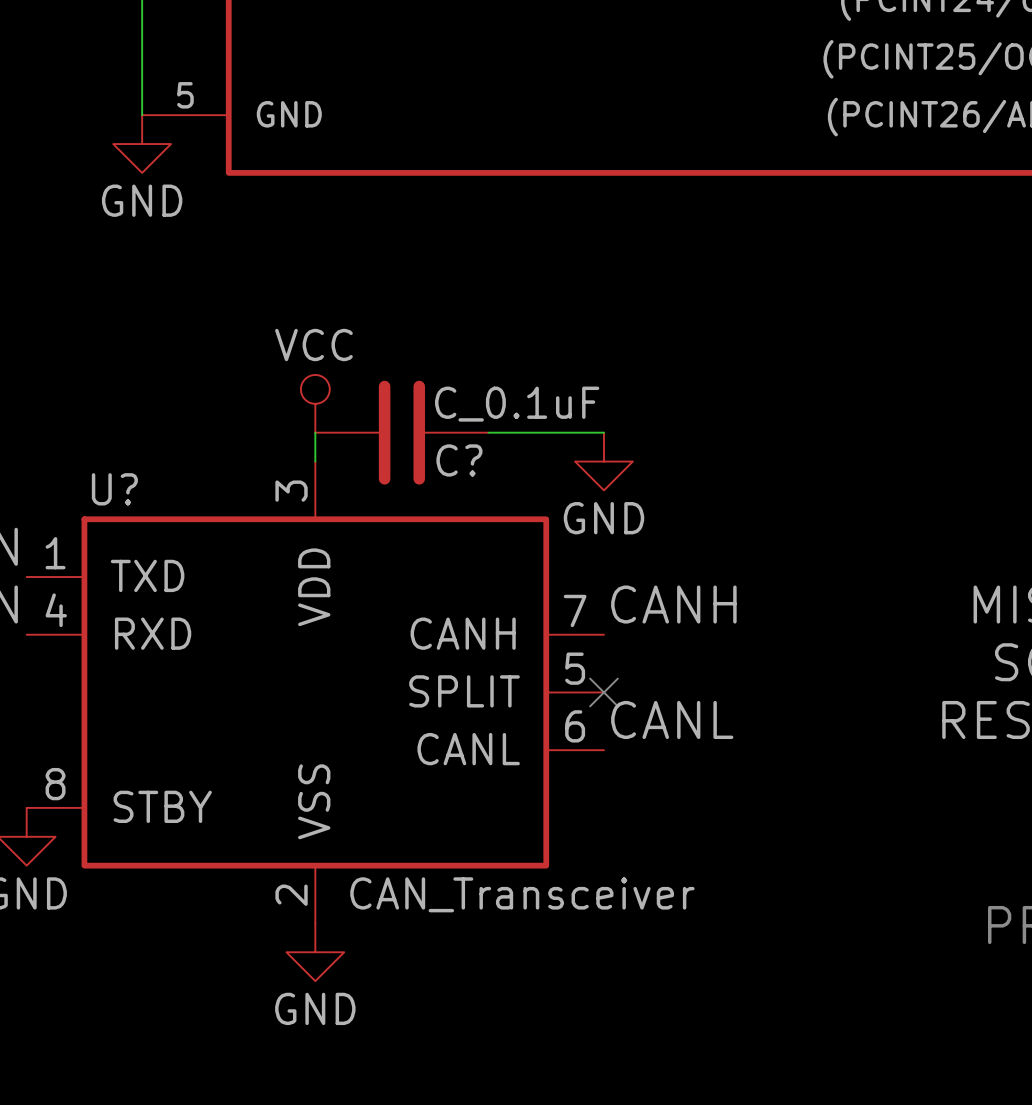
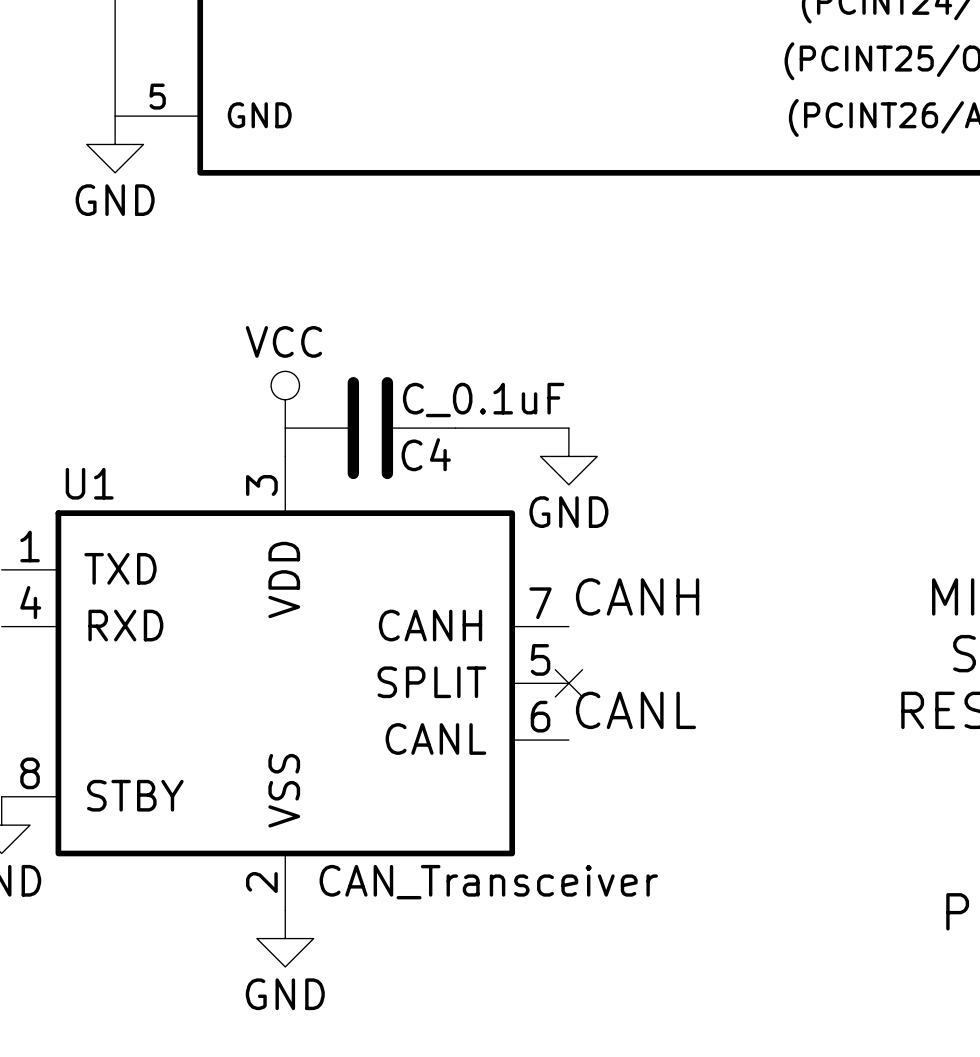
C? name: C? (459, 460) -> C4 (426, 454)
U? name: U? (114, 489) -> U1 (89, 483)

